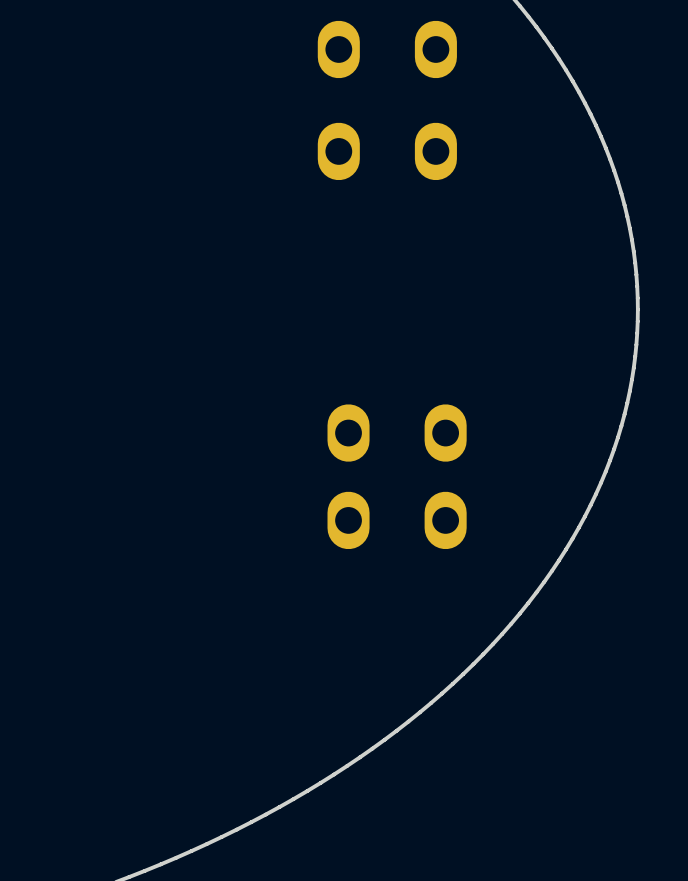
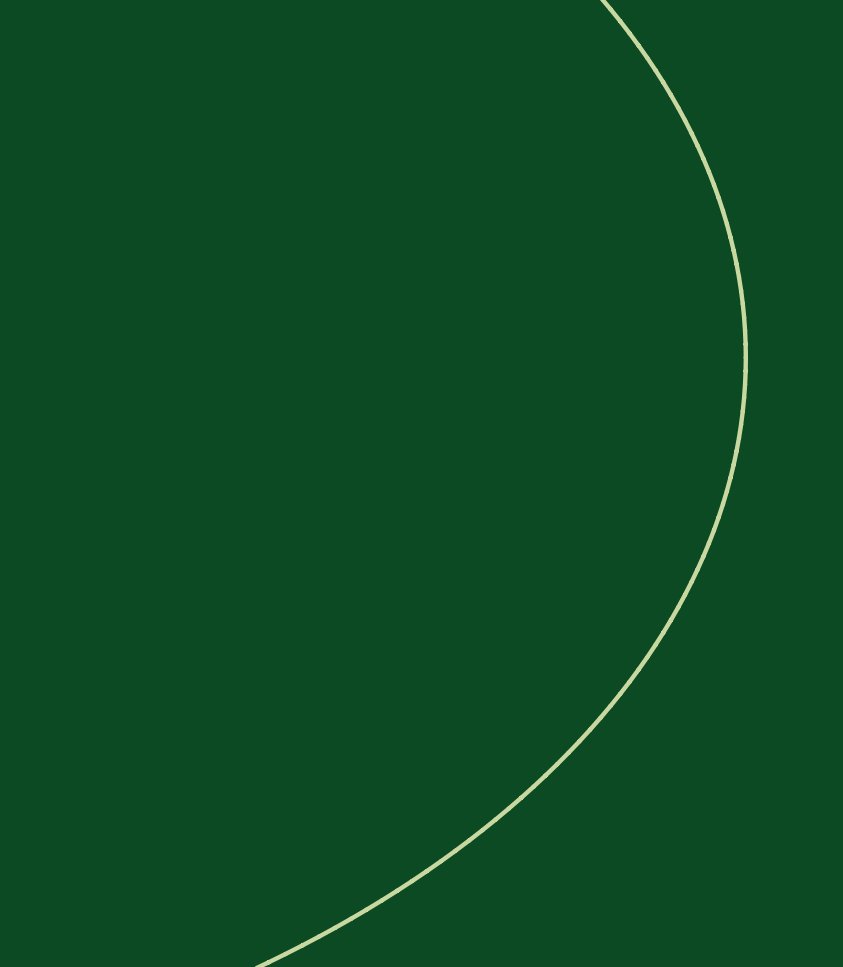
part: (387, 49) -> none
part: (387, 151) -> none
part: (397, 433) -> none
part: (397, 520) -> none

